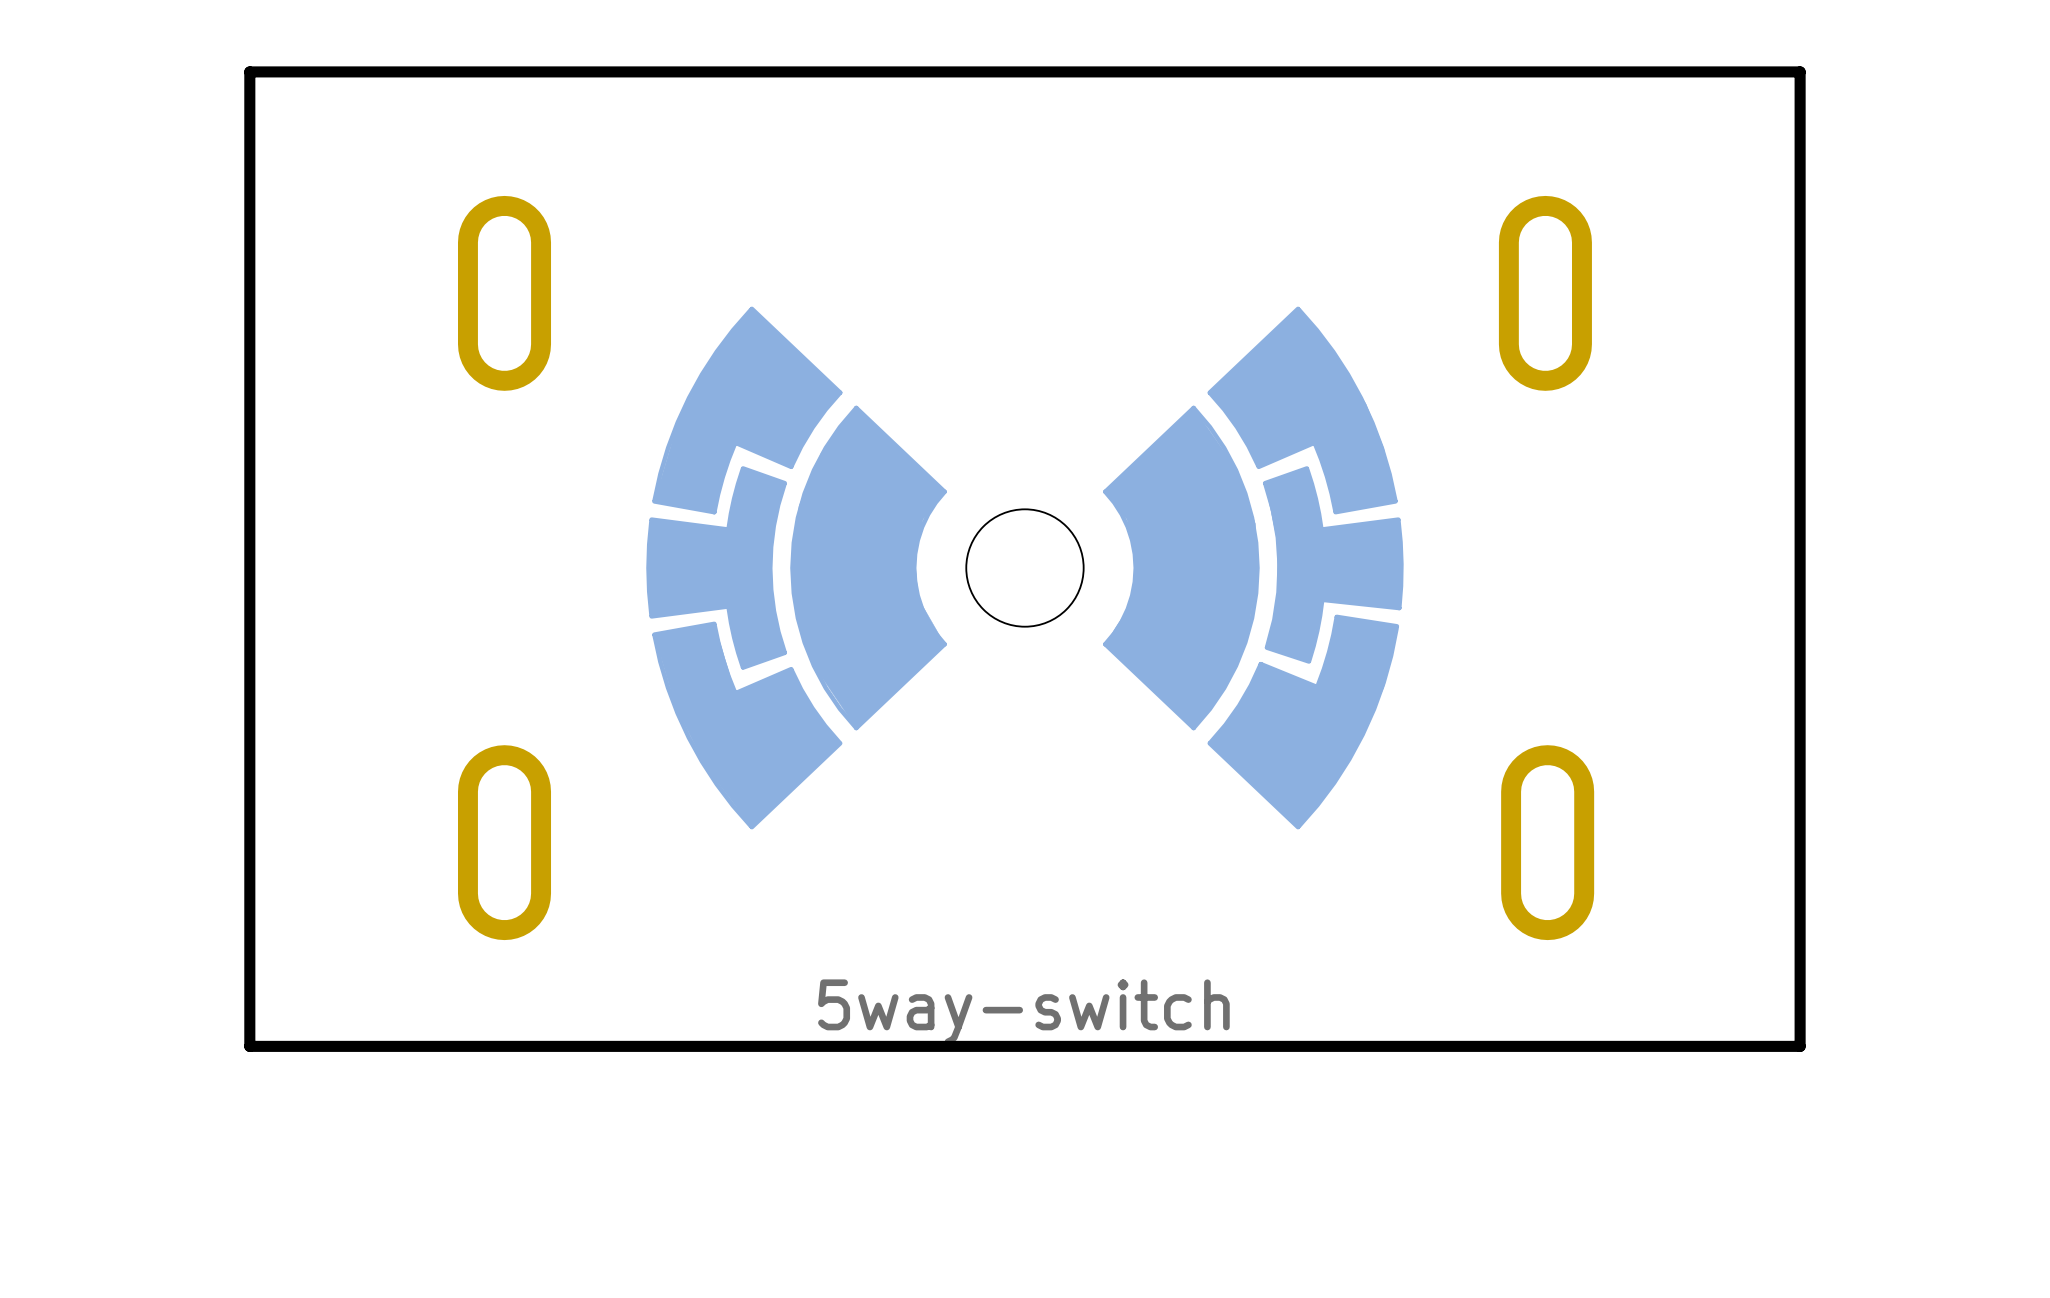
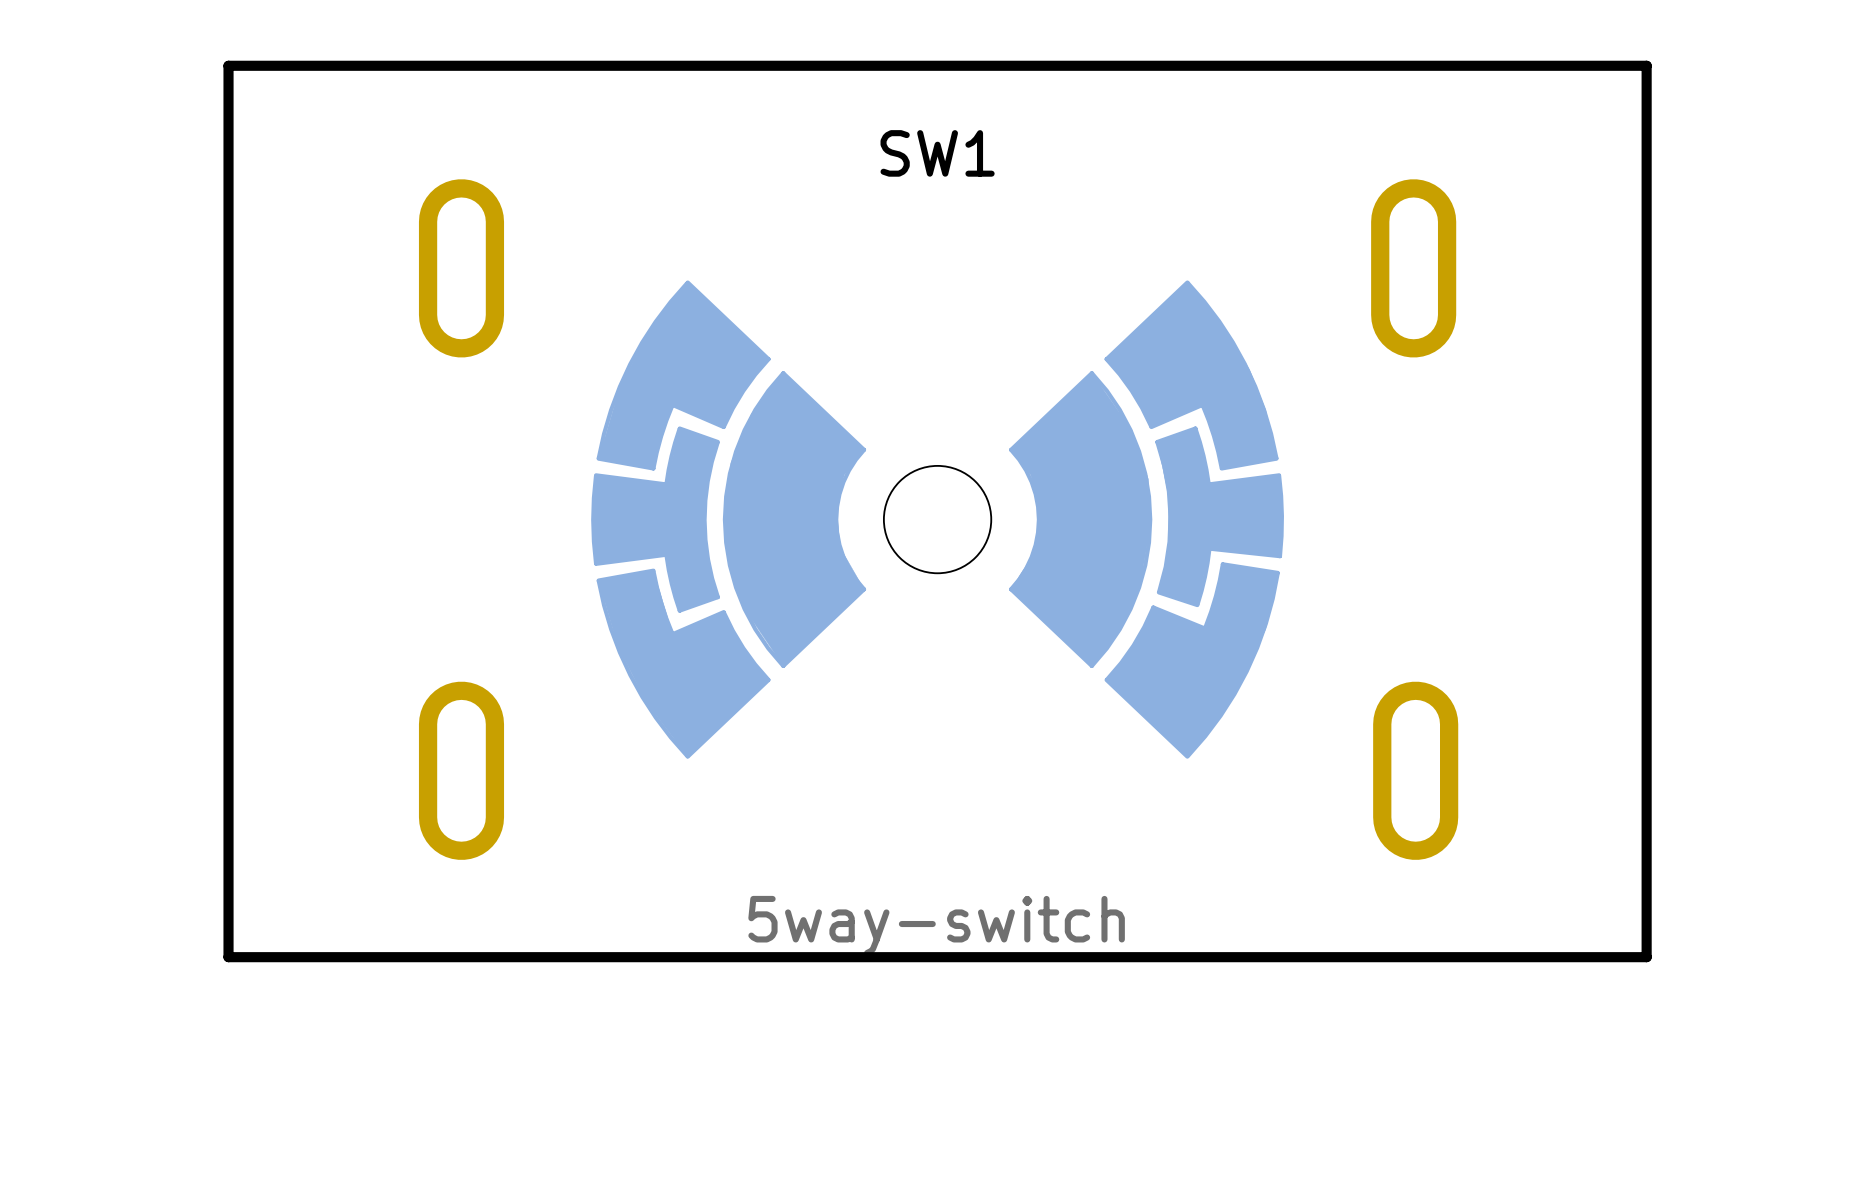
SW1: none -> 5way-switch (937, 519)

